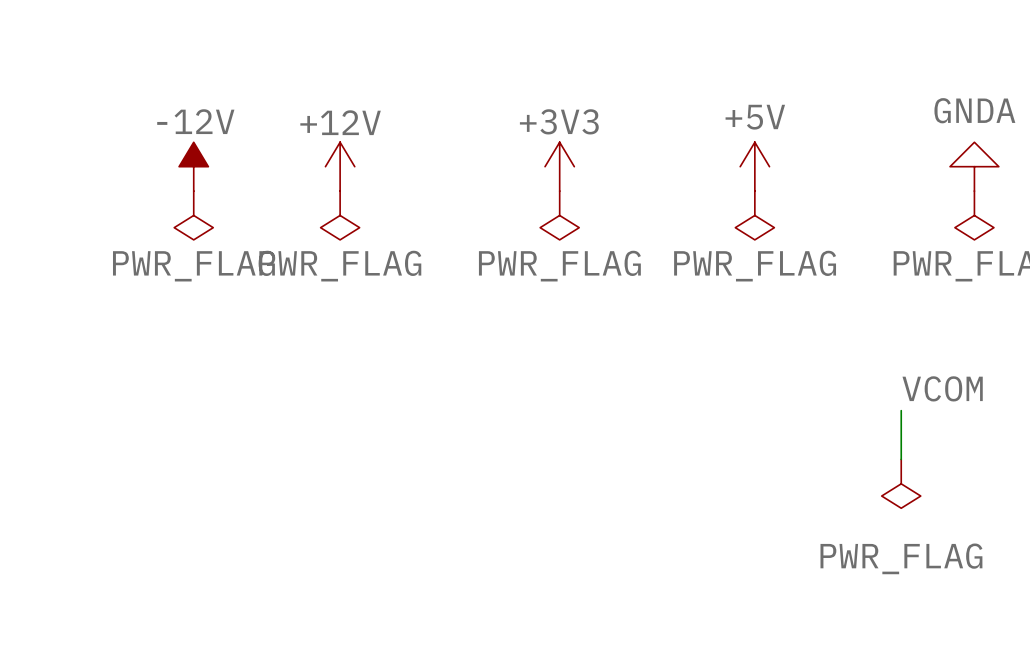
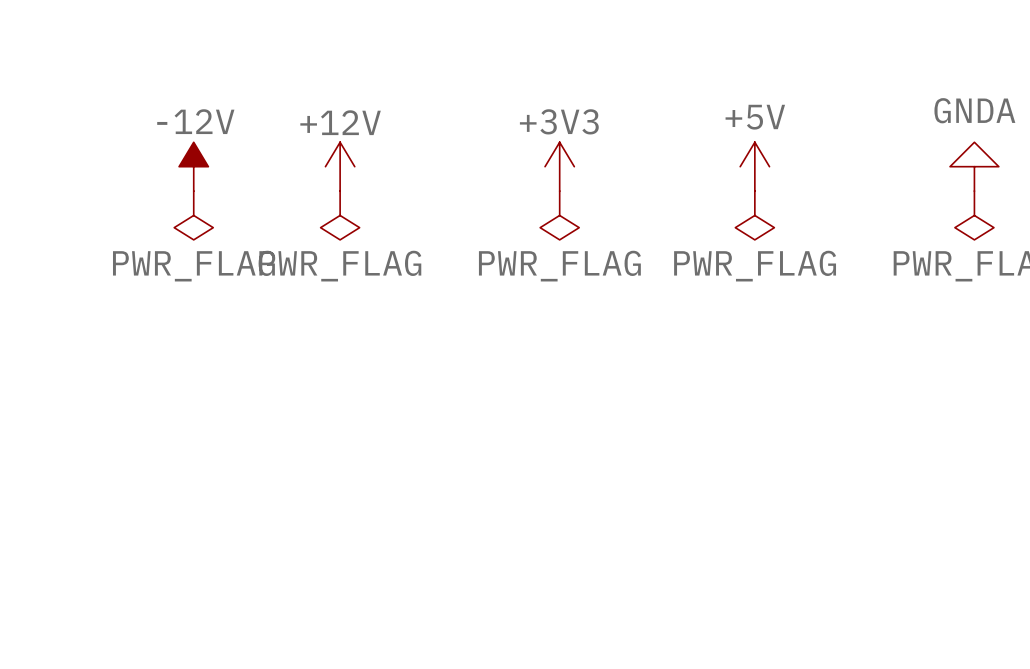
label: VCOM (942, 388) -> none
wire: (901, 410) (901, 459) -> none
power symbol: PWR_FLAG (901, 483) -> none

